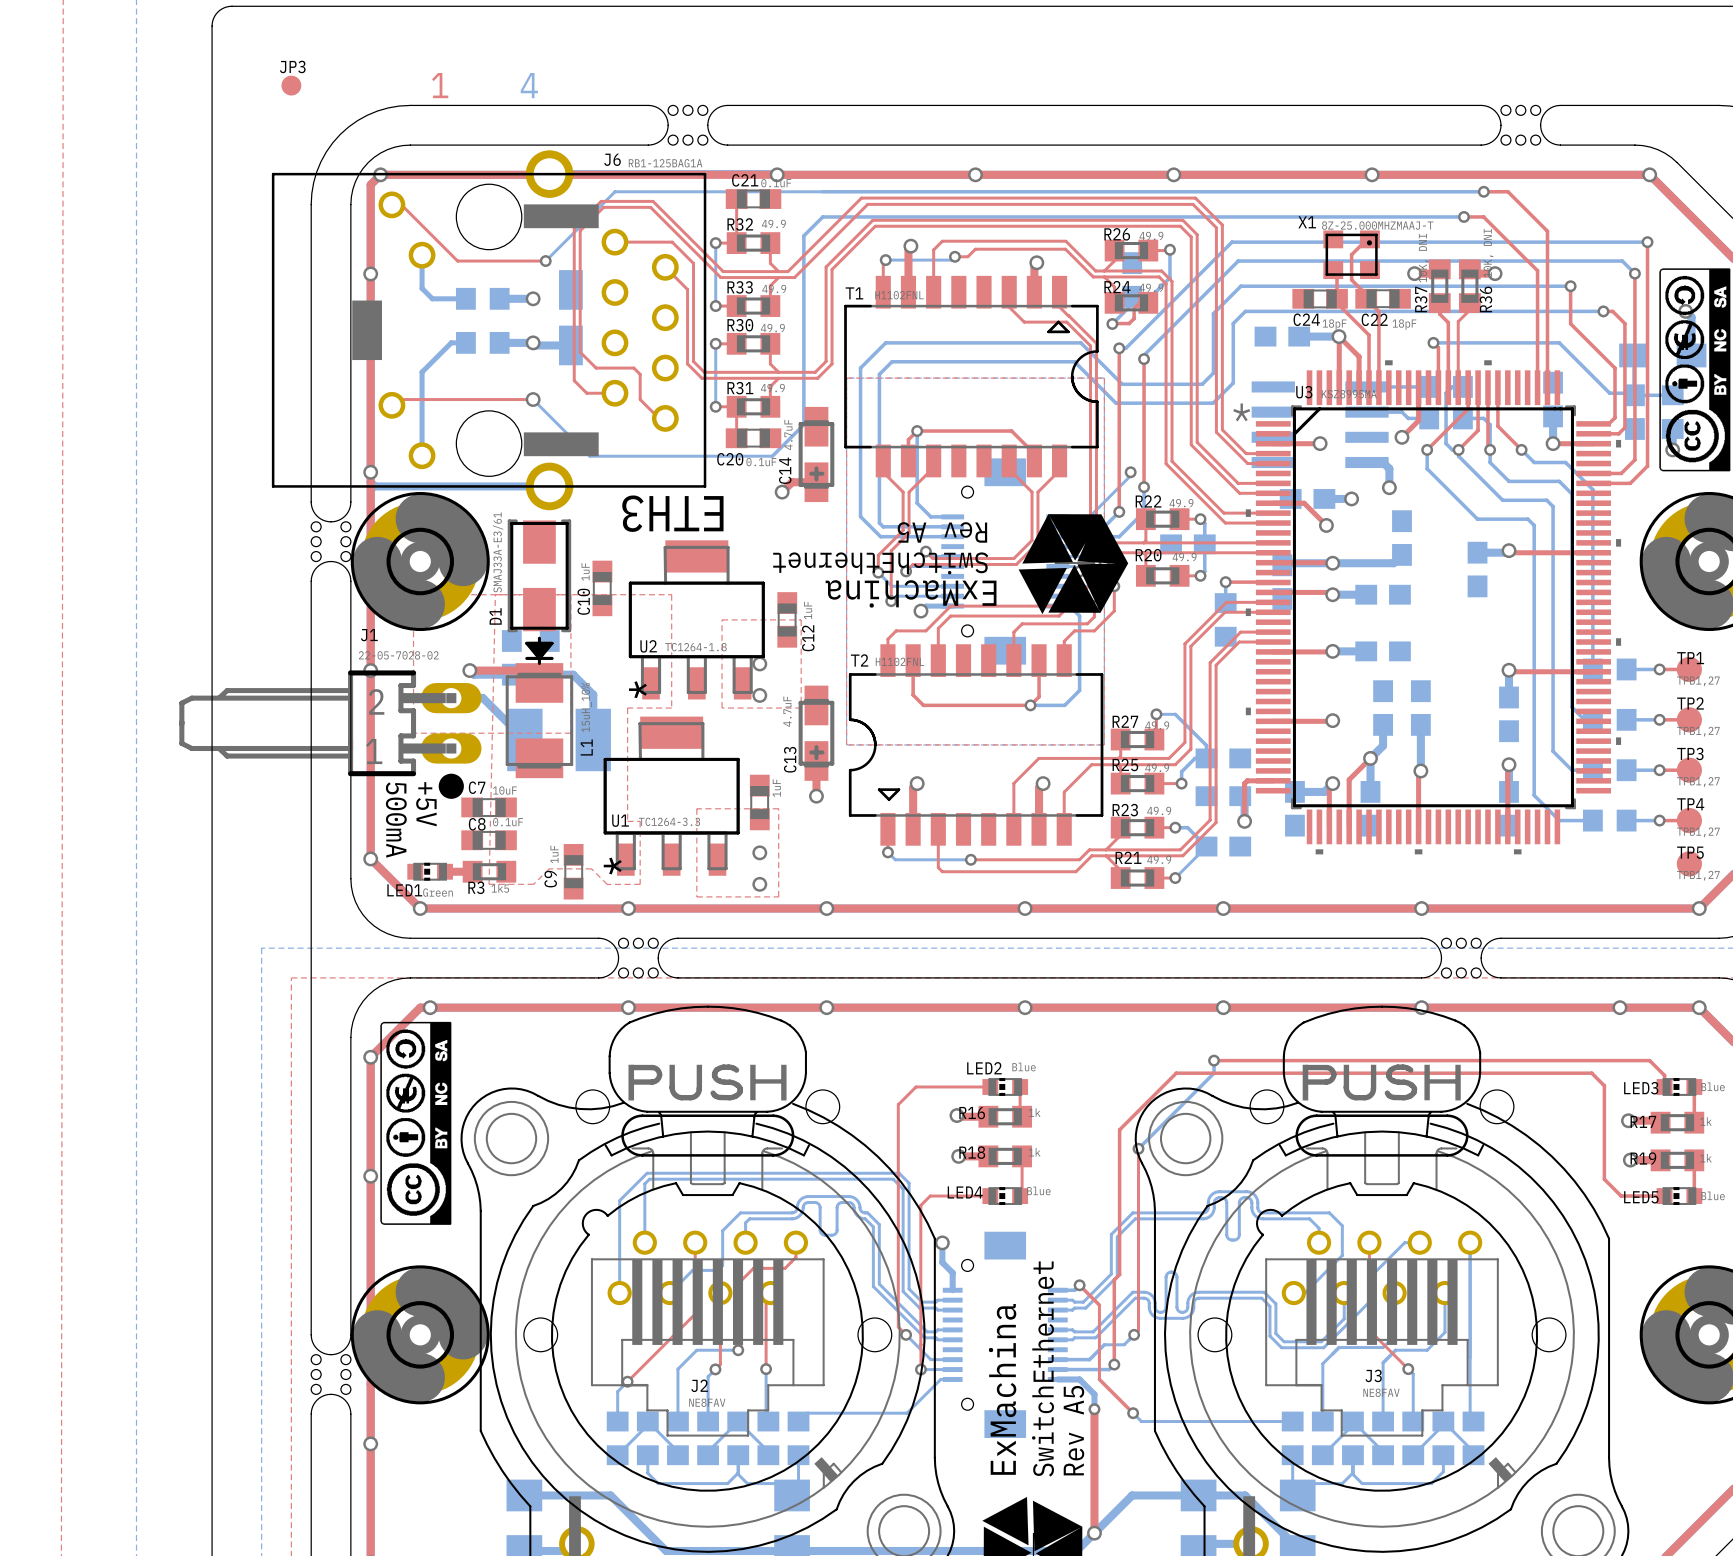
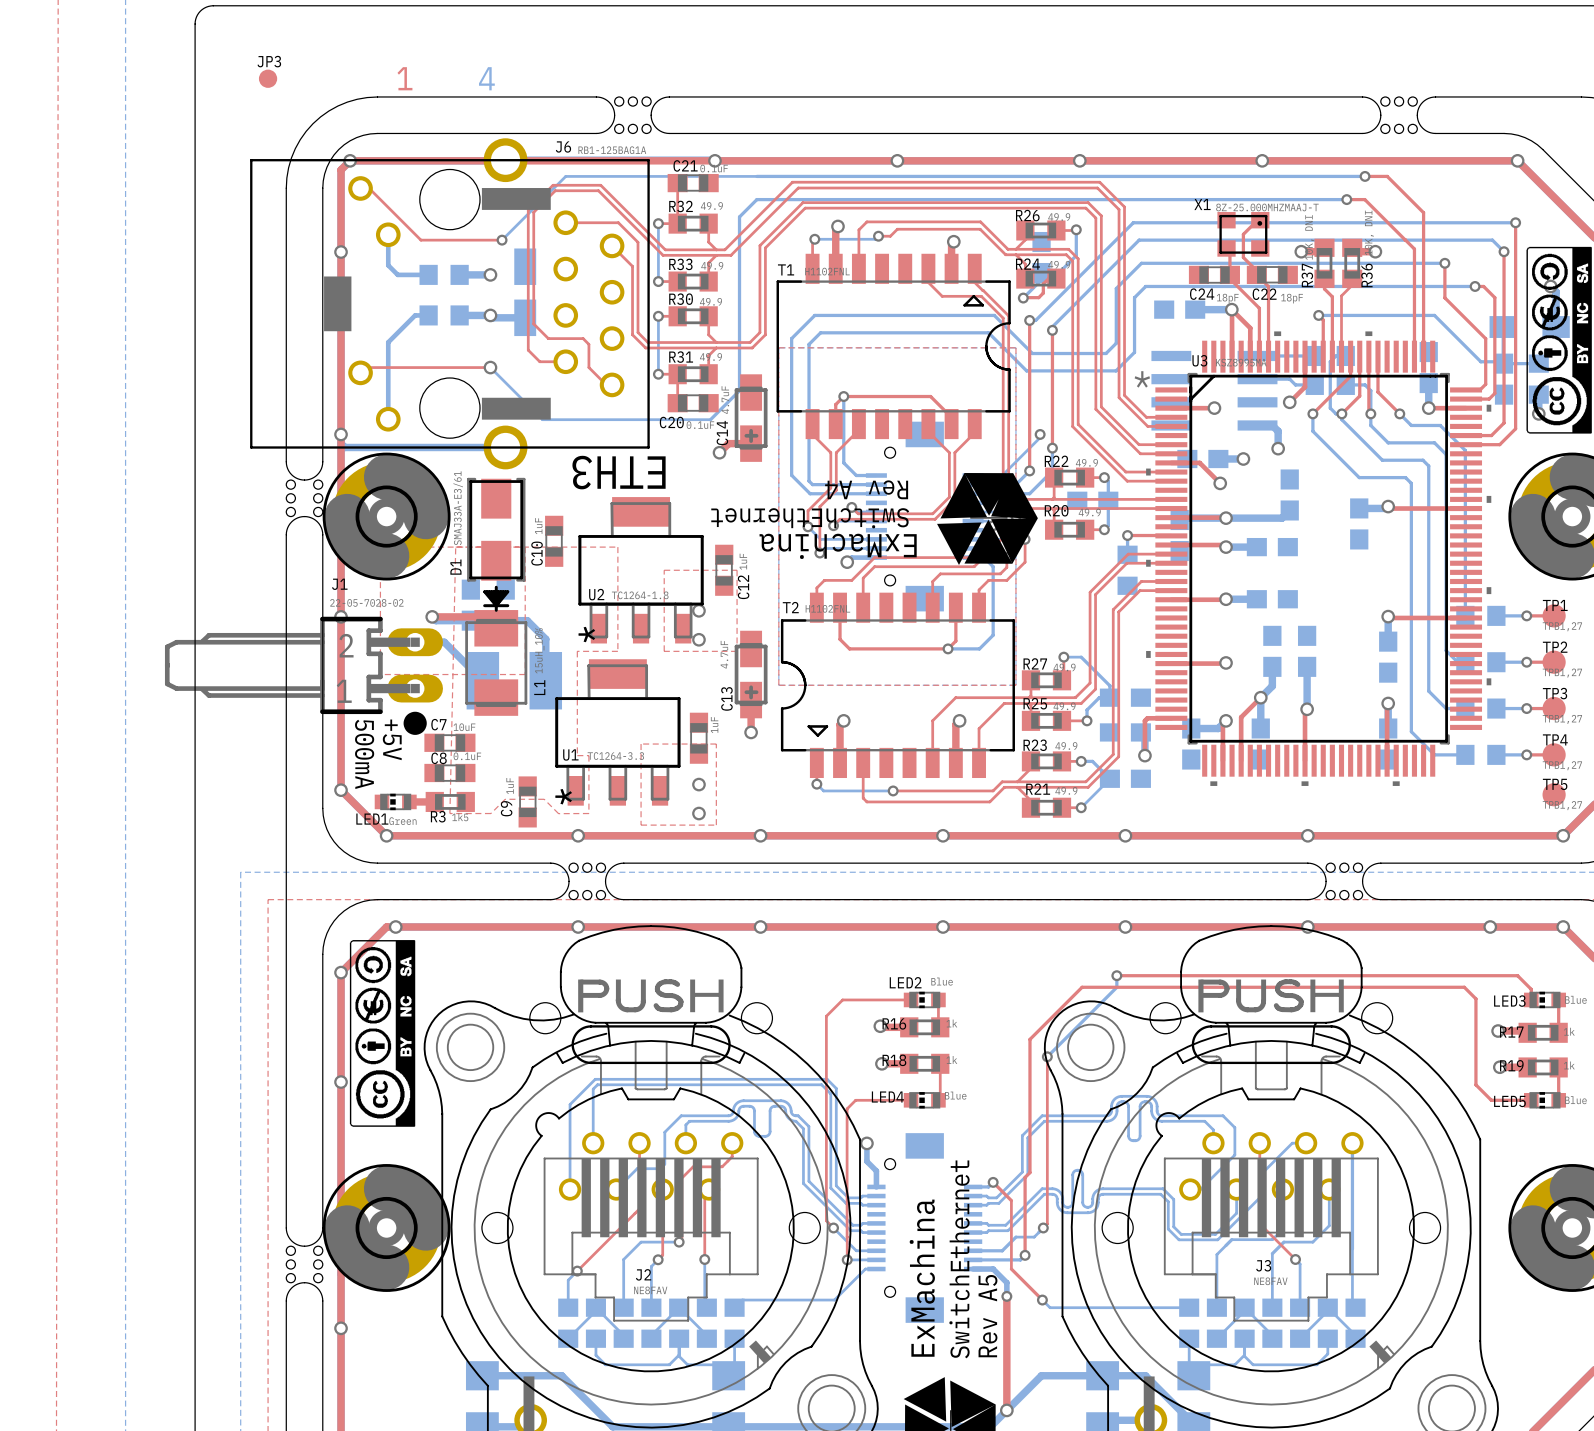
text: Rev A5 (942, 532) -> Rev A4 (866, 489)

